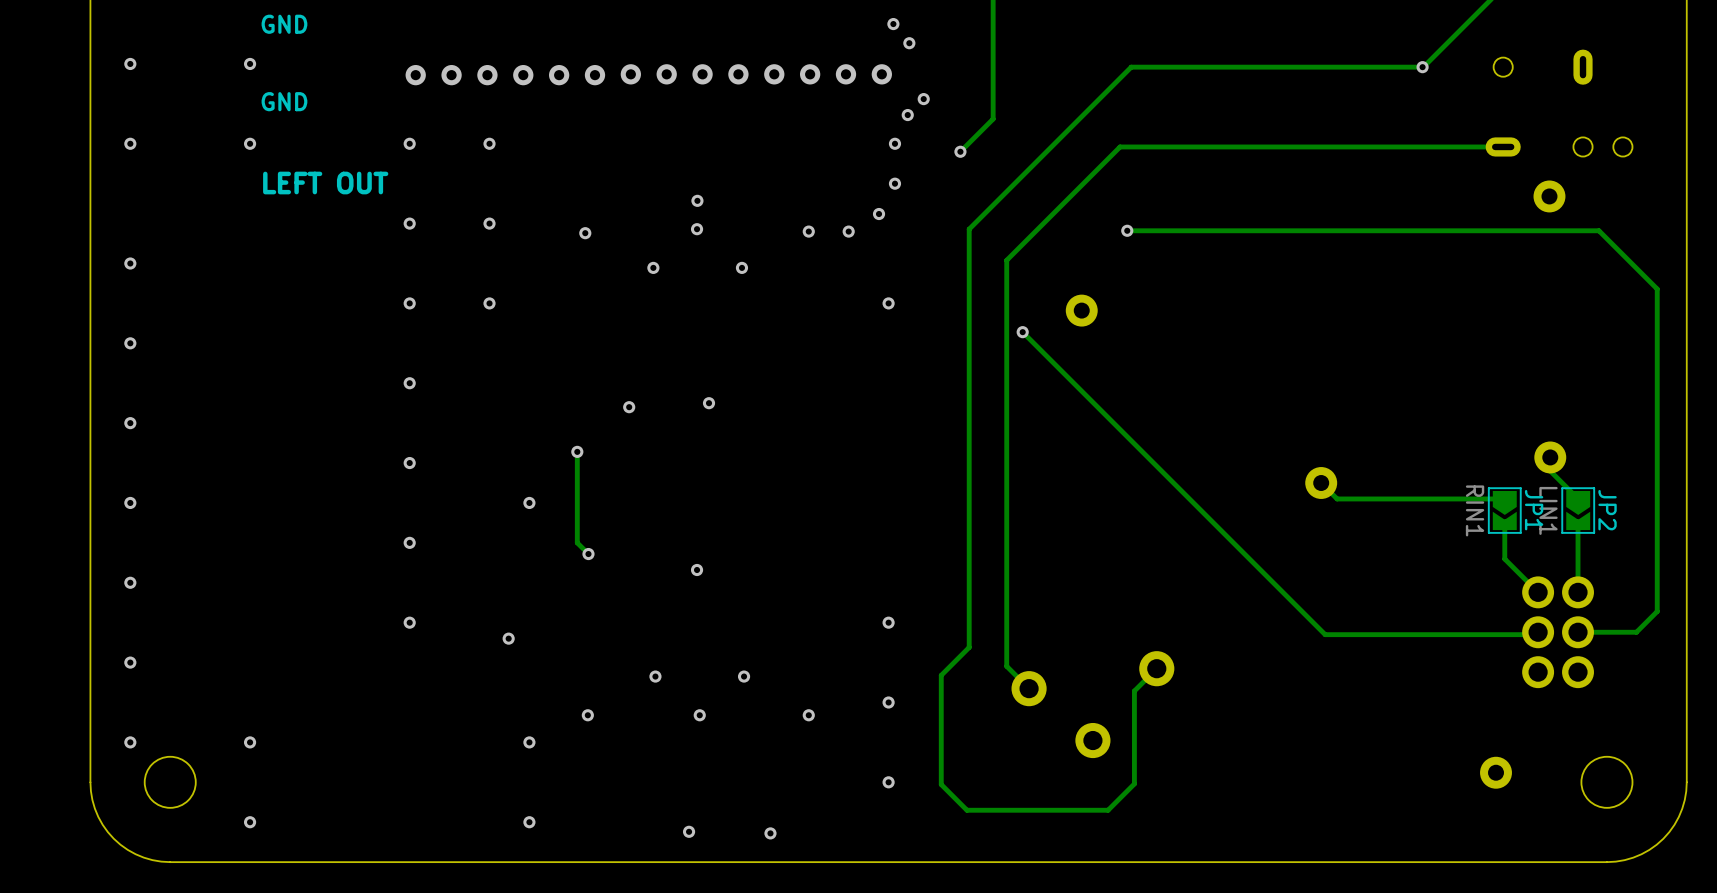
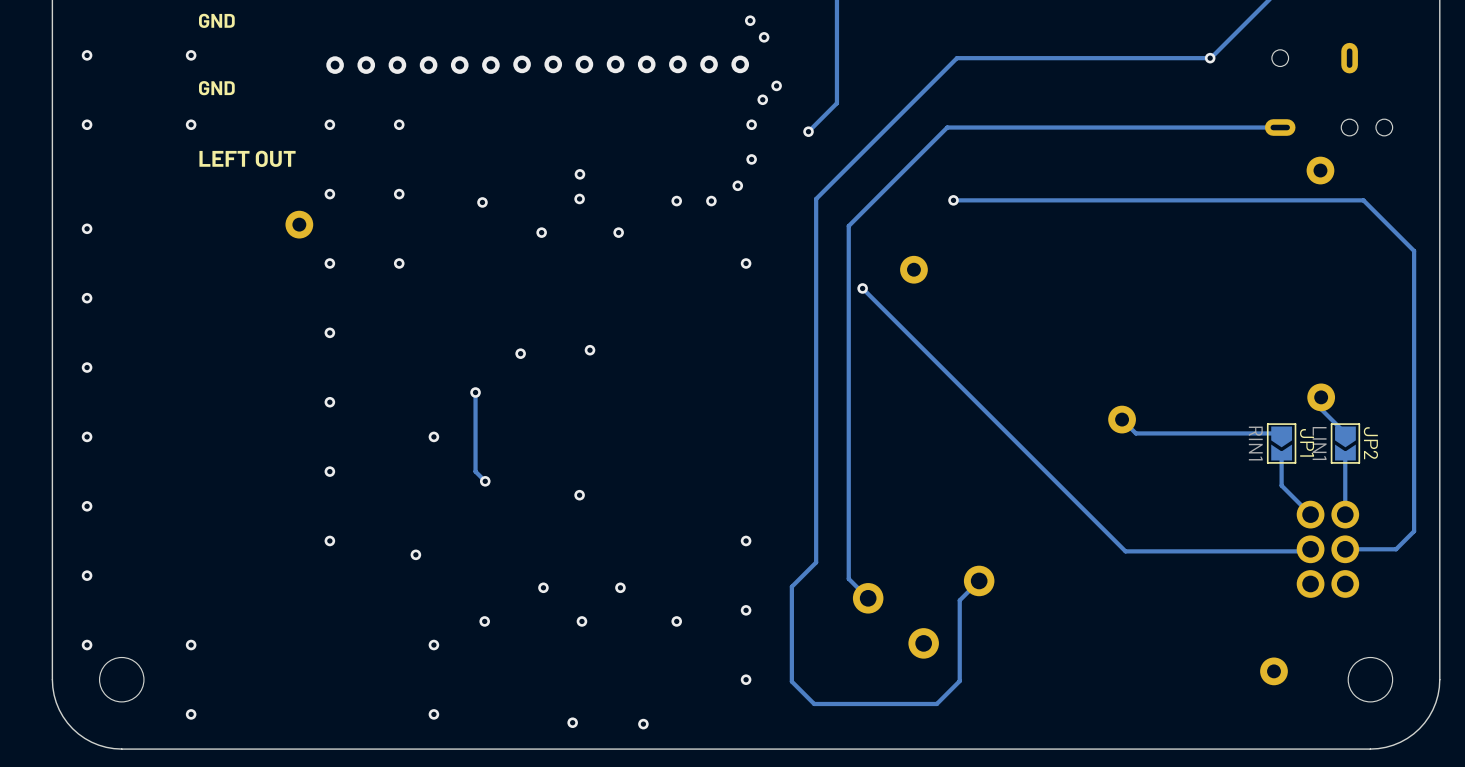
part: none -> (299, 224)

